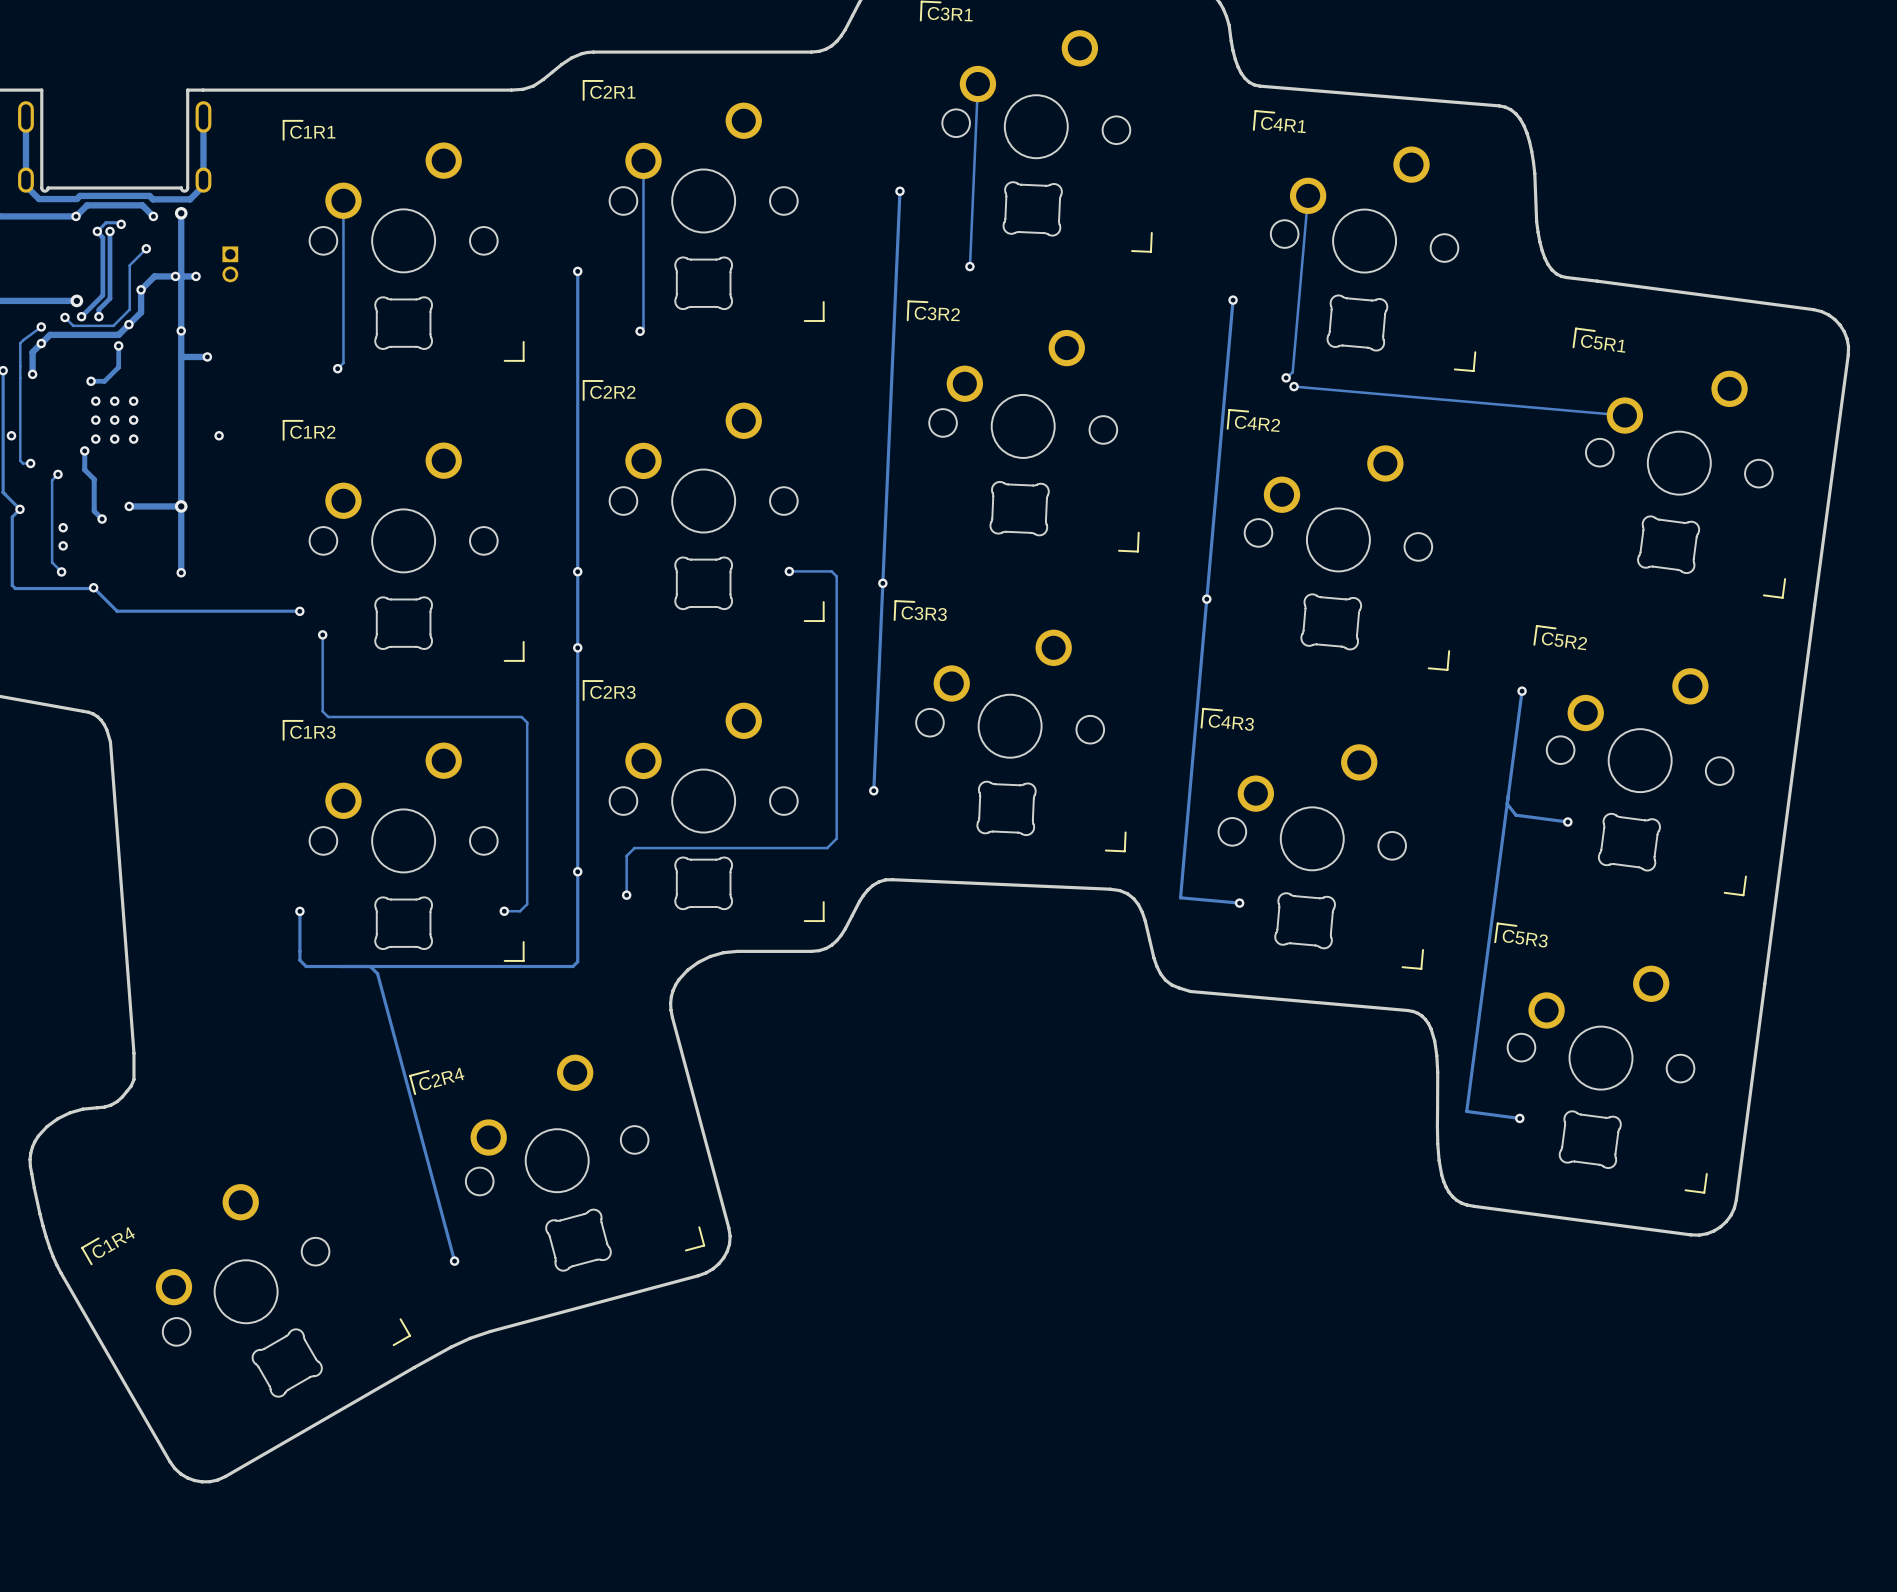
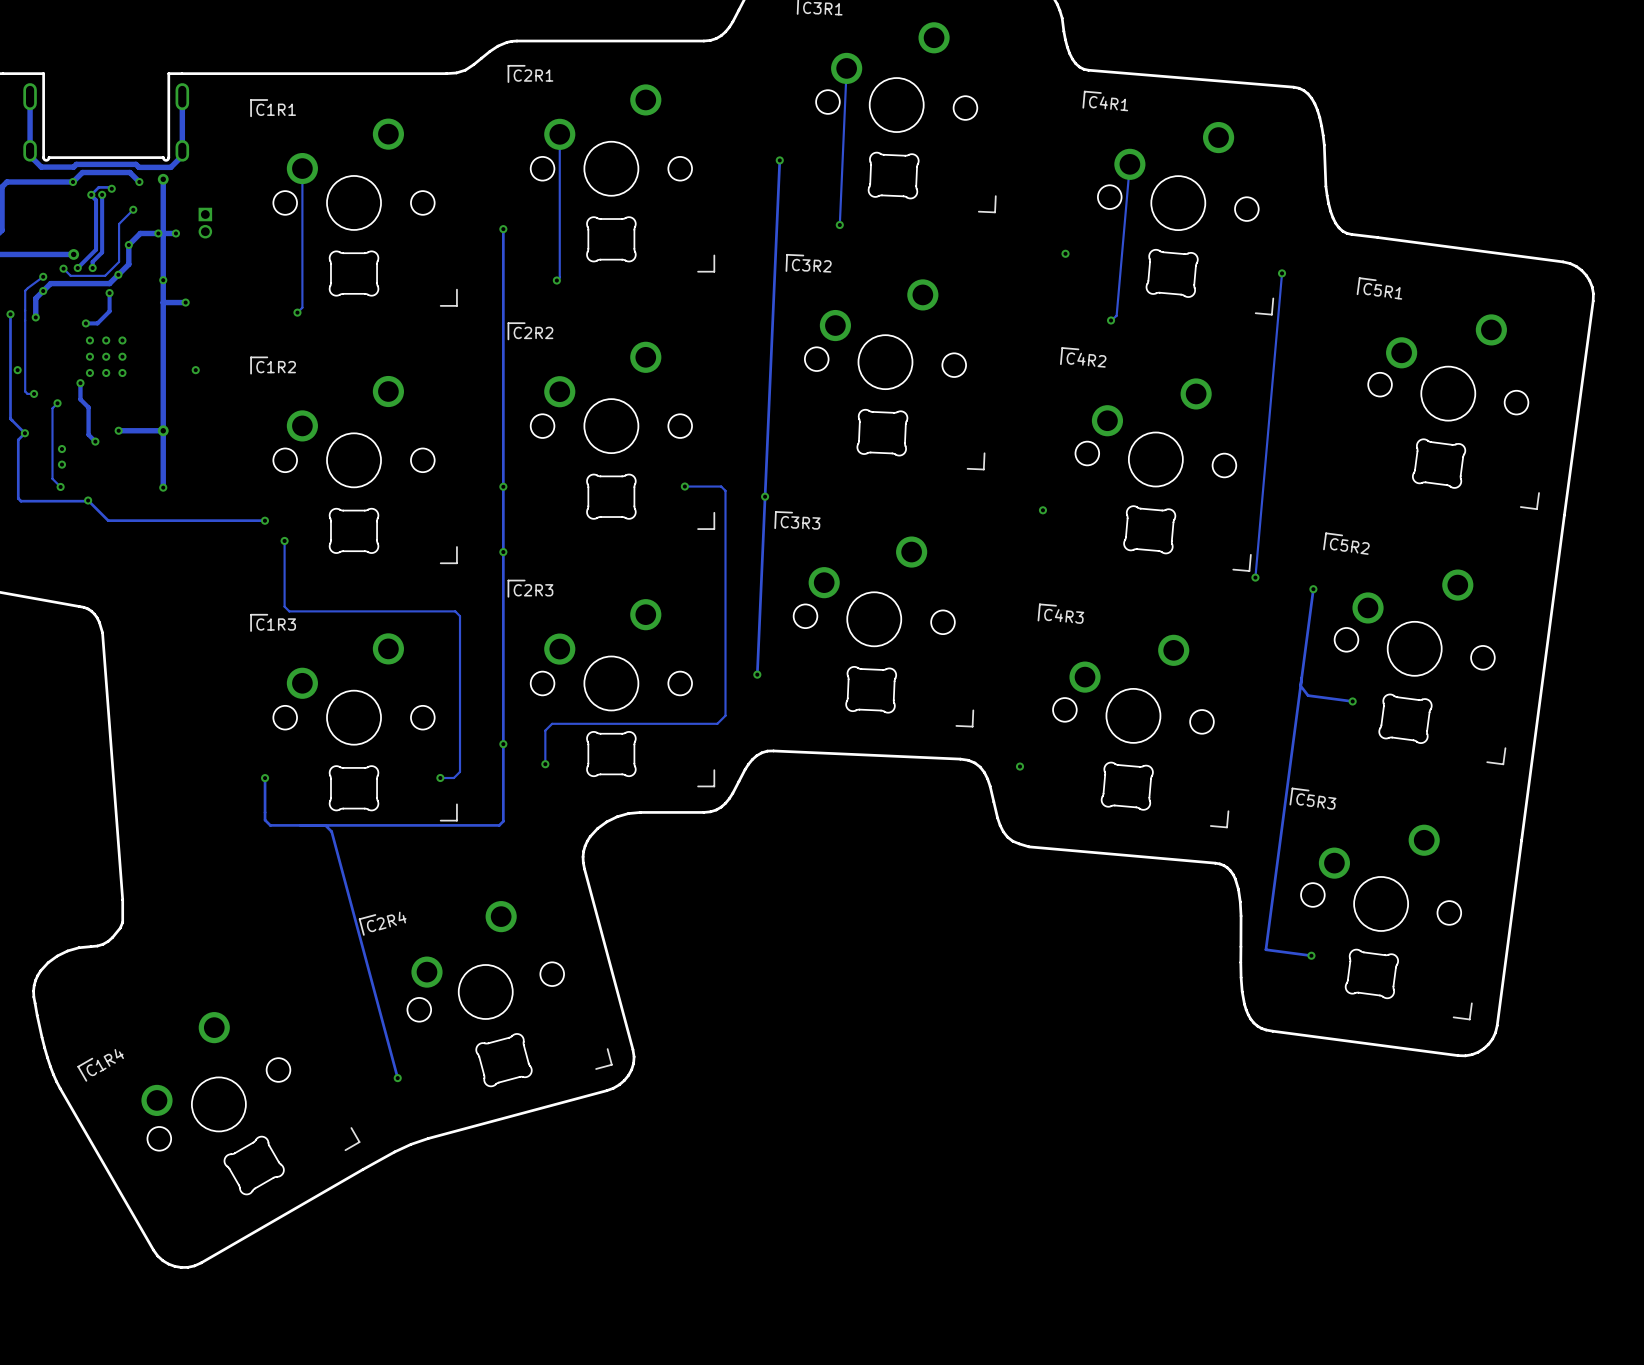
track: (1233, 300) (1180, 897) (1239, 903) -> none
track: none -> (1282, 273) (1255, 577)
via: none -> (1282, 273)
track: (1294, 386) (1624, 415) -> none
via: (1294, 386) -> none
via: none -> (1255, 577)
via position: (1239, 903) -> (1019, 766)

